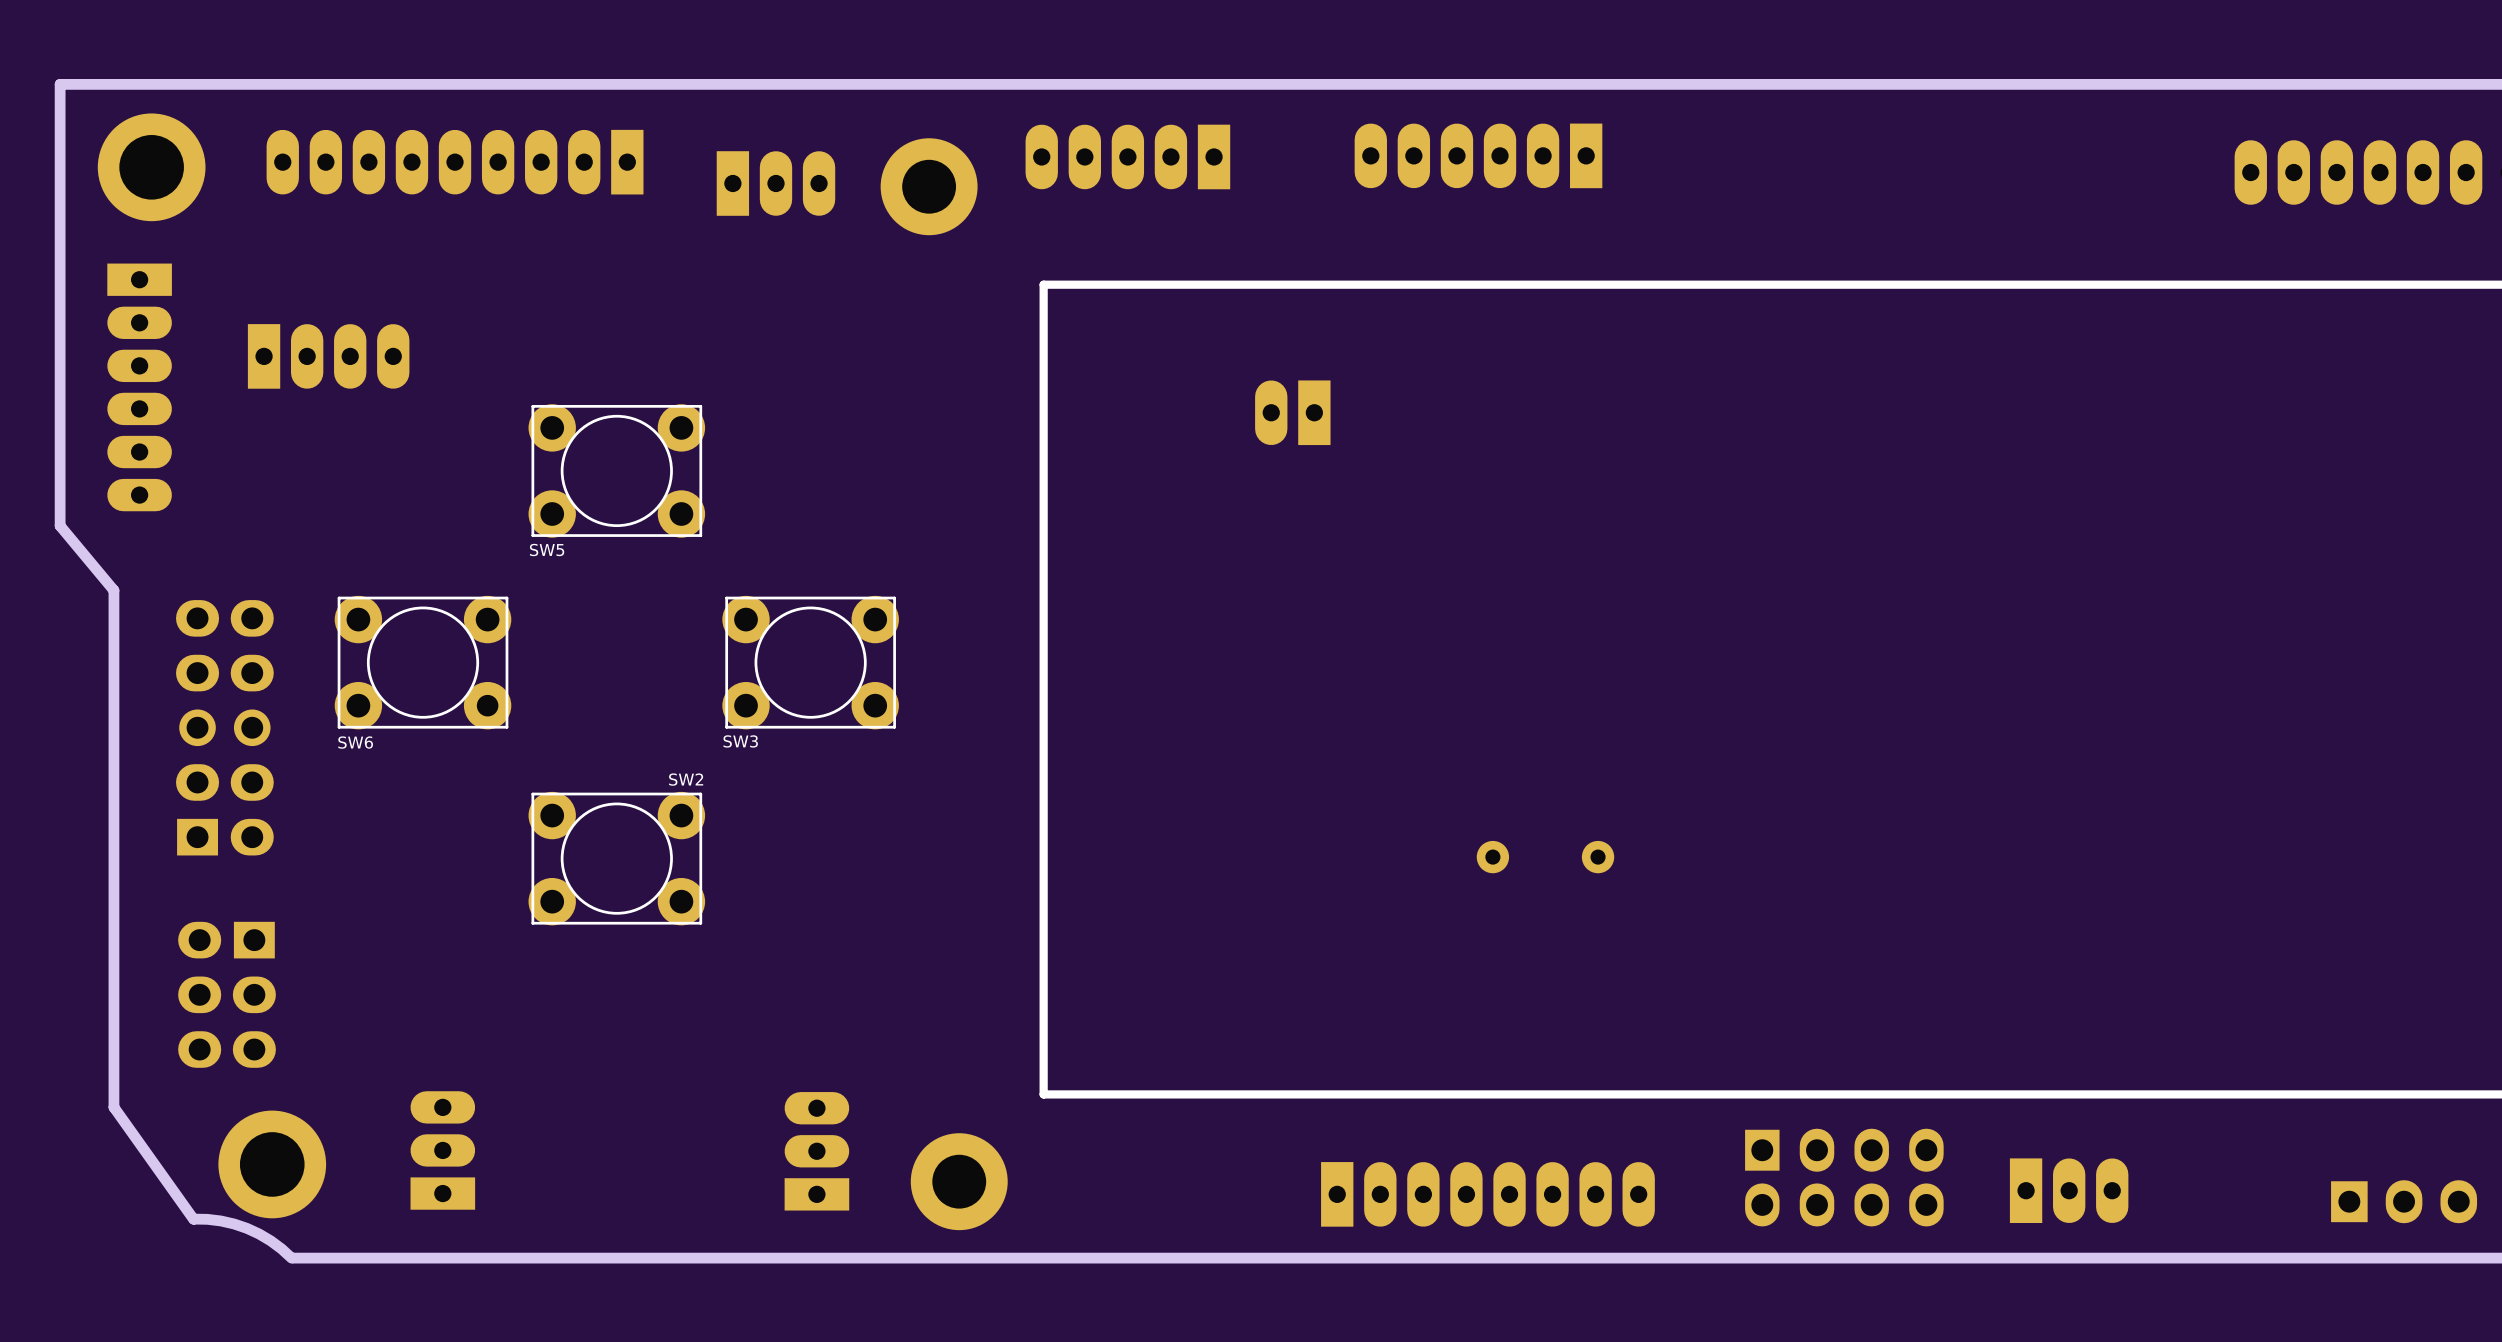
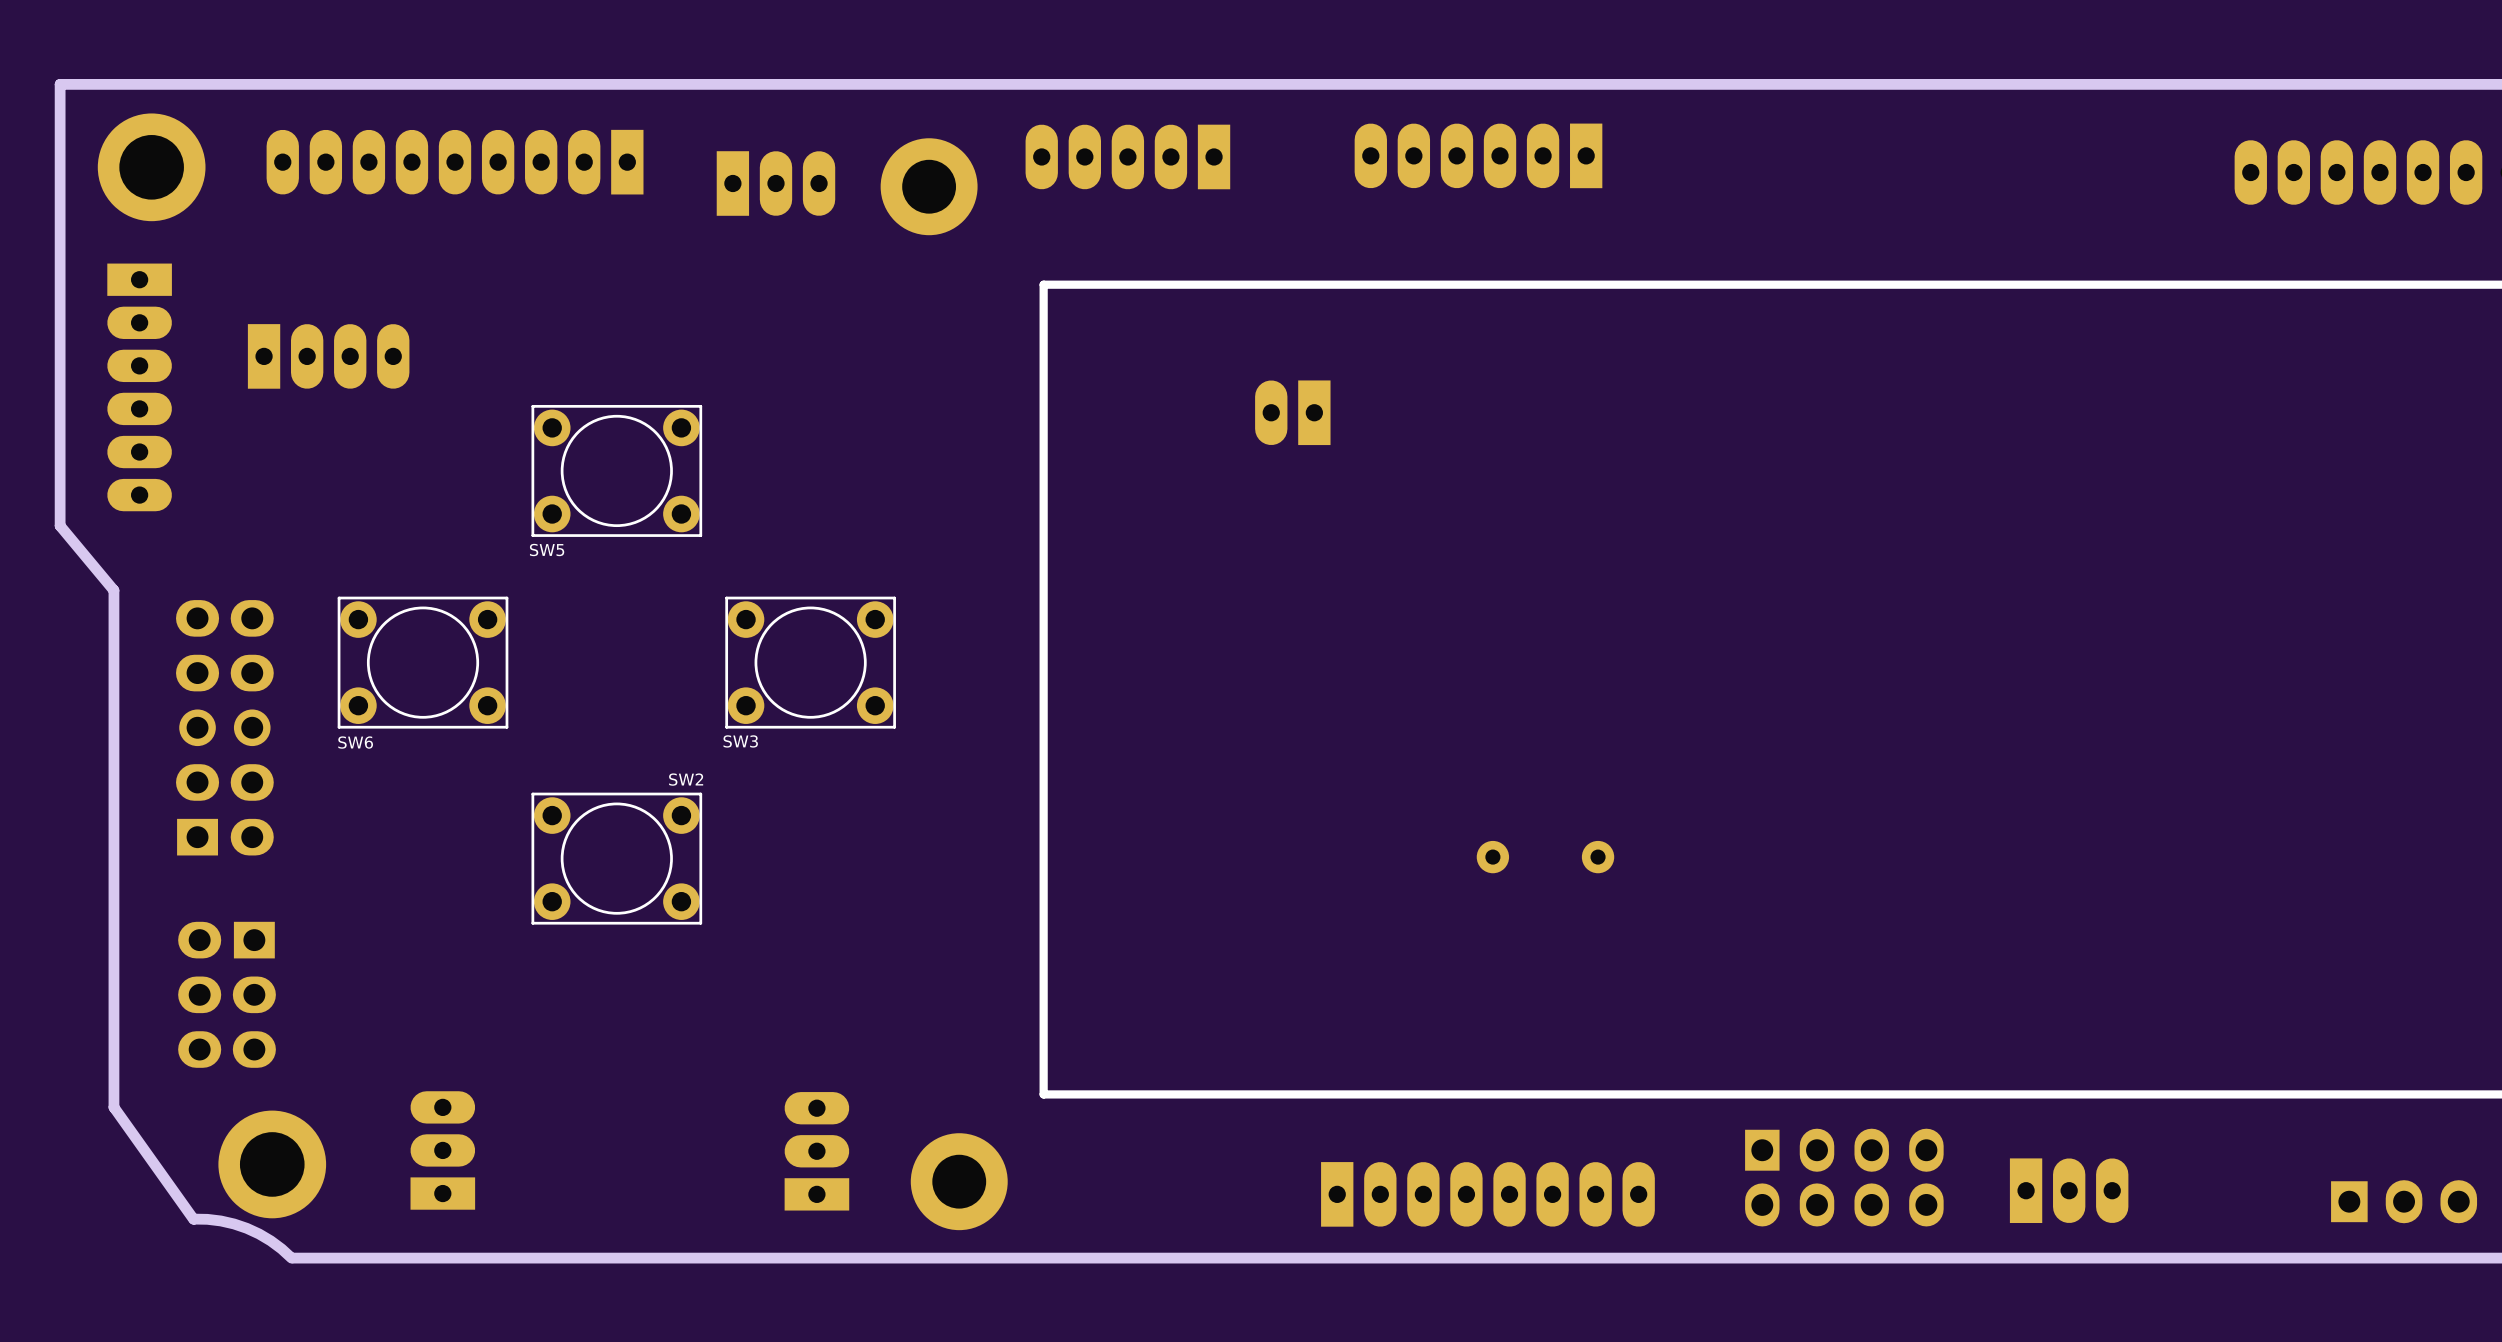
SW5 footprint: [528, 404, 706, 538] -> [531, 404, 703, 537]
SW6 footprint: [334, 595, 512, 730] -> [337, 596, 509, 729]
SW3 footprint: [722, 595, 899, 730] -> [725, 596, 896, 729]
SW2 footprint: [528, 791, 706, 926] -> [531, 792, 703, 925]

